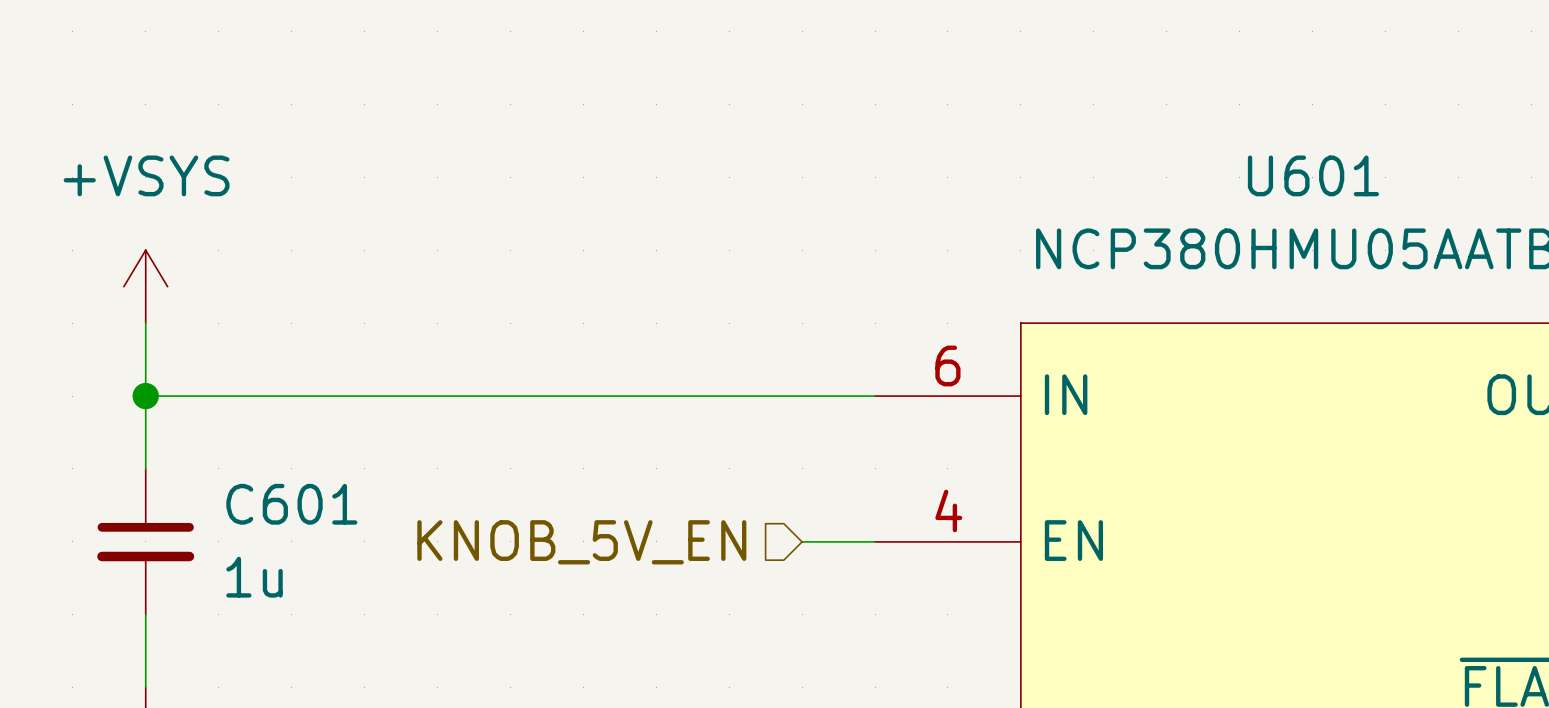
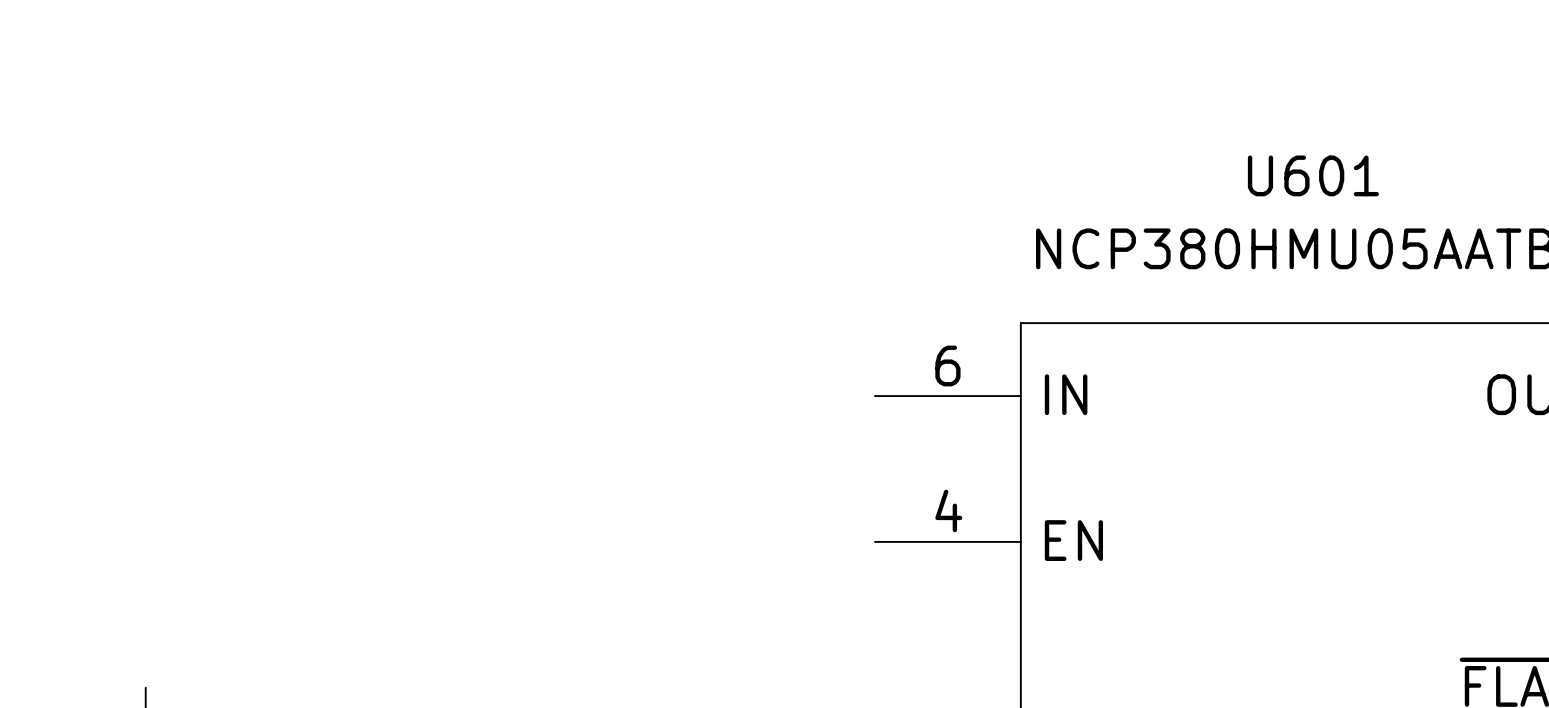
power symbol: +VSYS (145, 286) -> none
wire: (145, 323) (145, 468) -> none
wire: (145, 396) (875, 396) -> none
junction: (145, 396) -> none
C601: 1u (145, 541) -> none
wire: (802, 541) (875, 541) -> none
hierarchical label: KNOB_5V_EN (581, 542) -> none
wire: (145, 614) (145, 687) -> none

